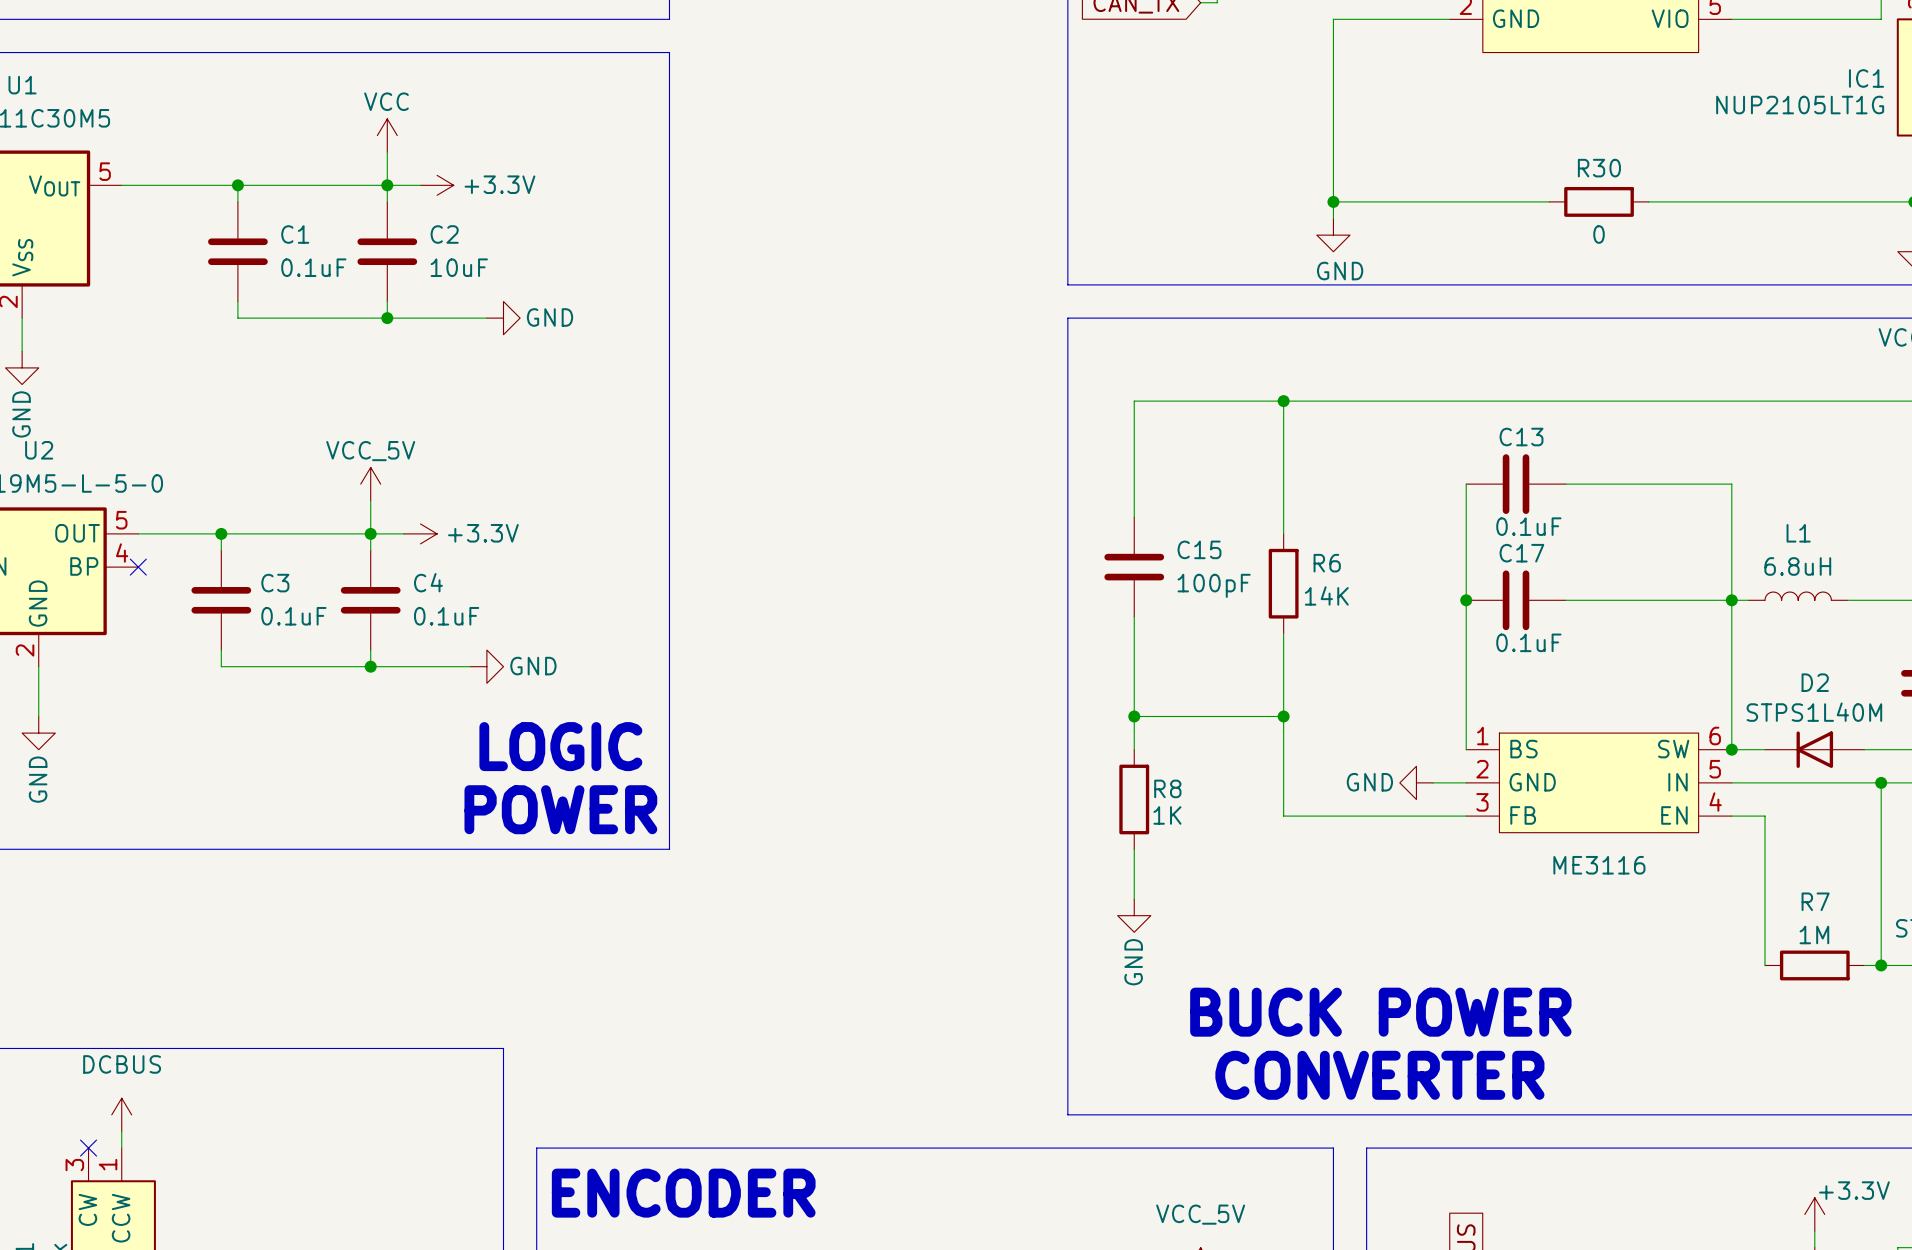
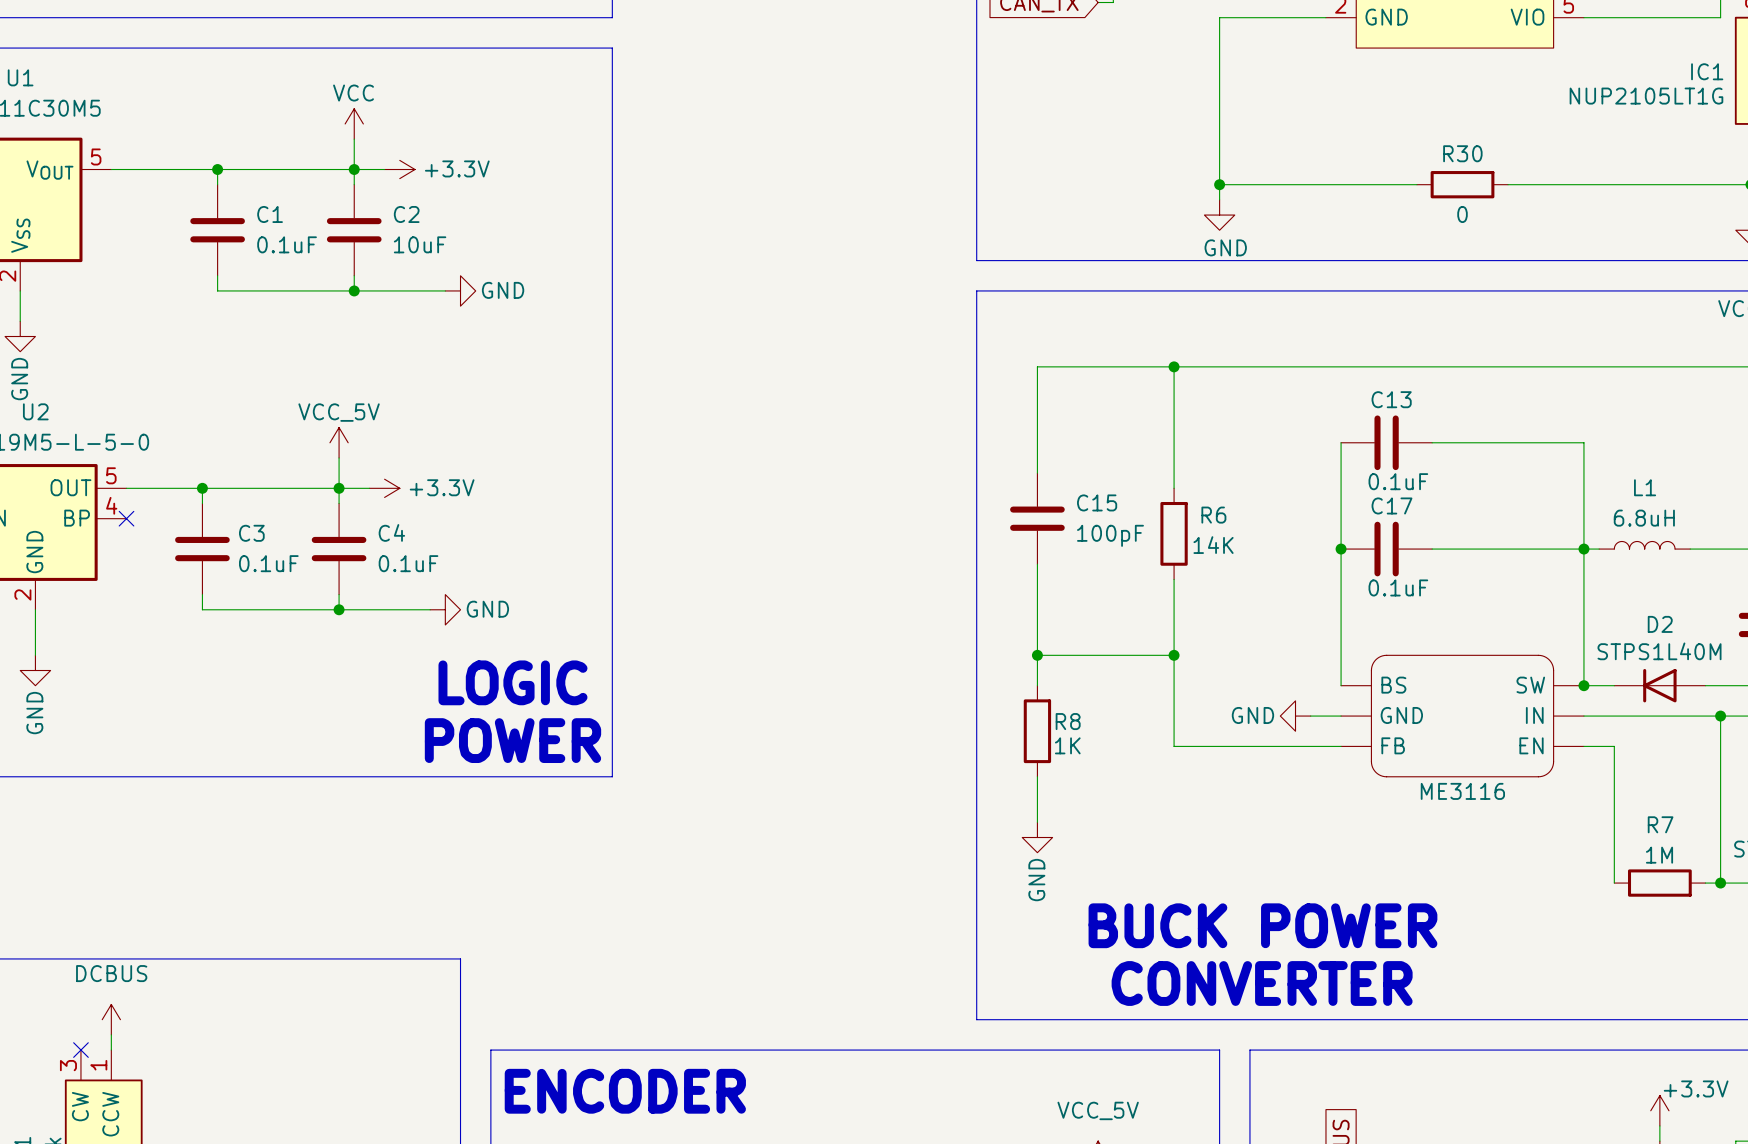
ME3116 symbol: [1466, 733, 1732, 833] -> [1341, 655, 1584, 777]

